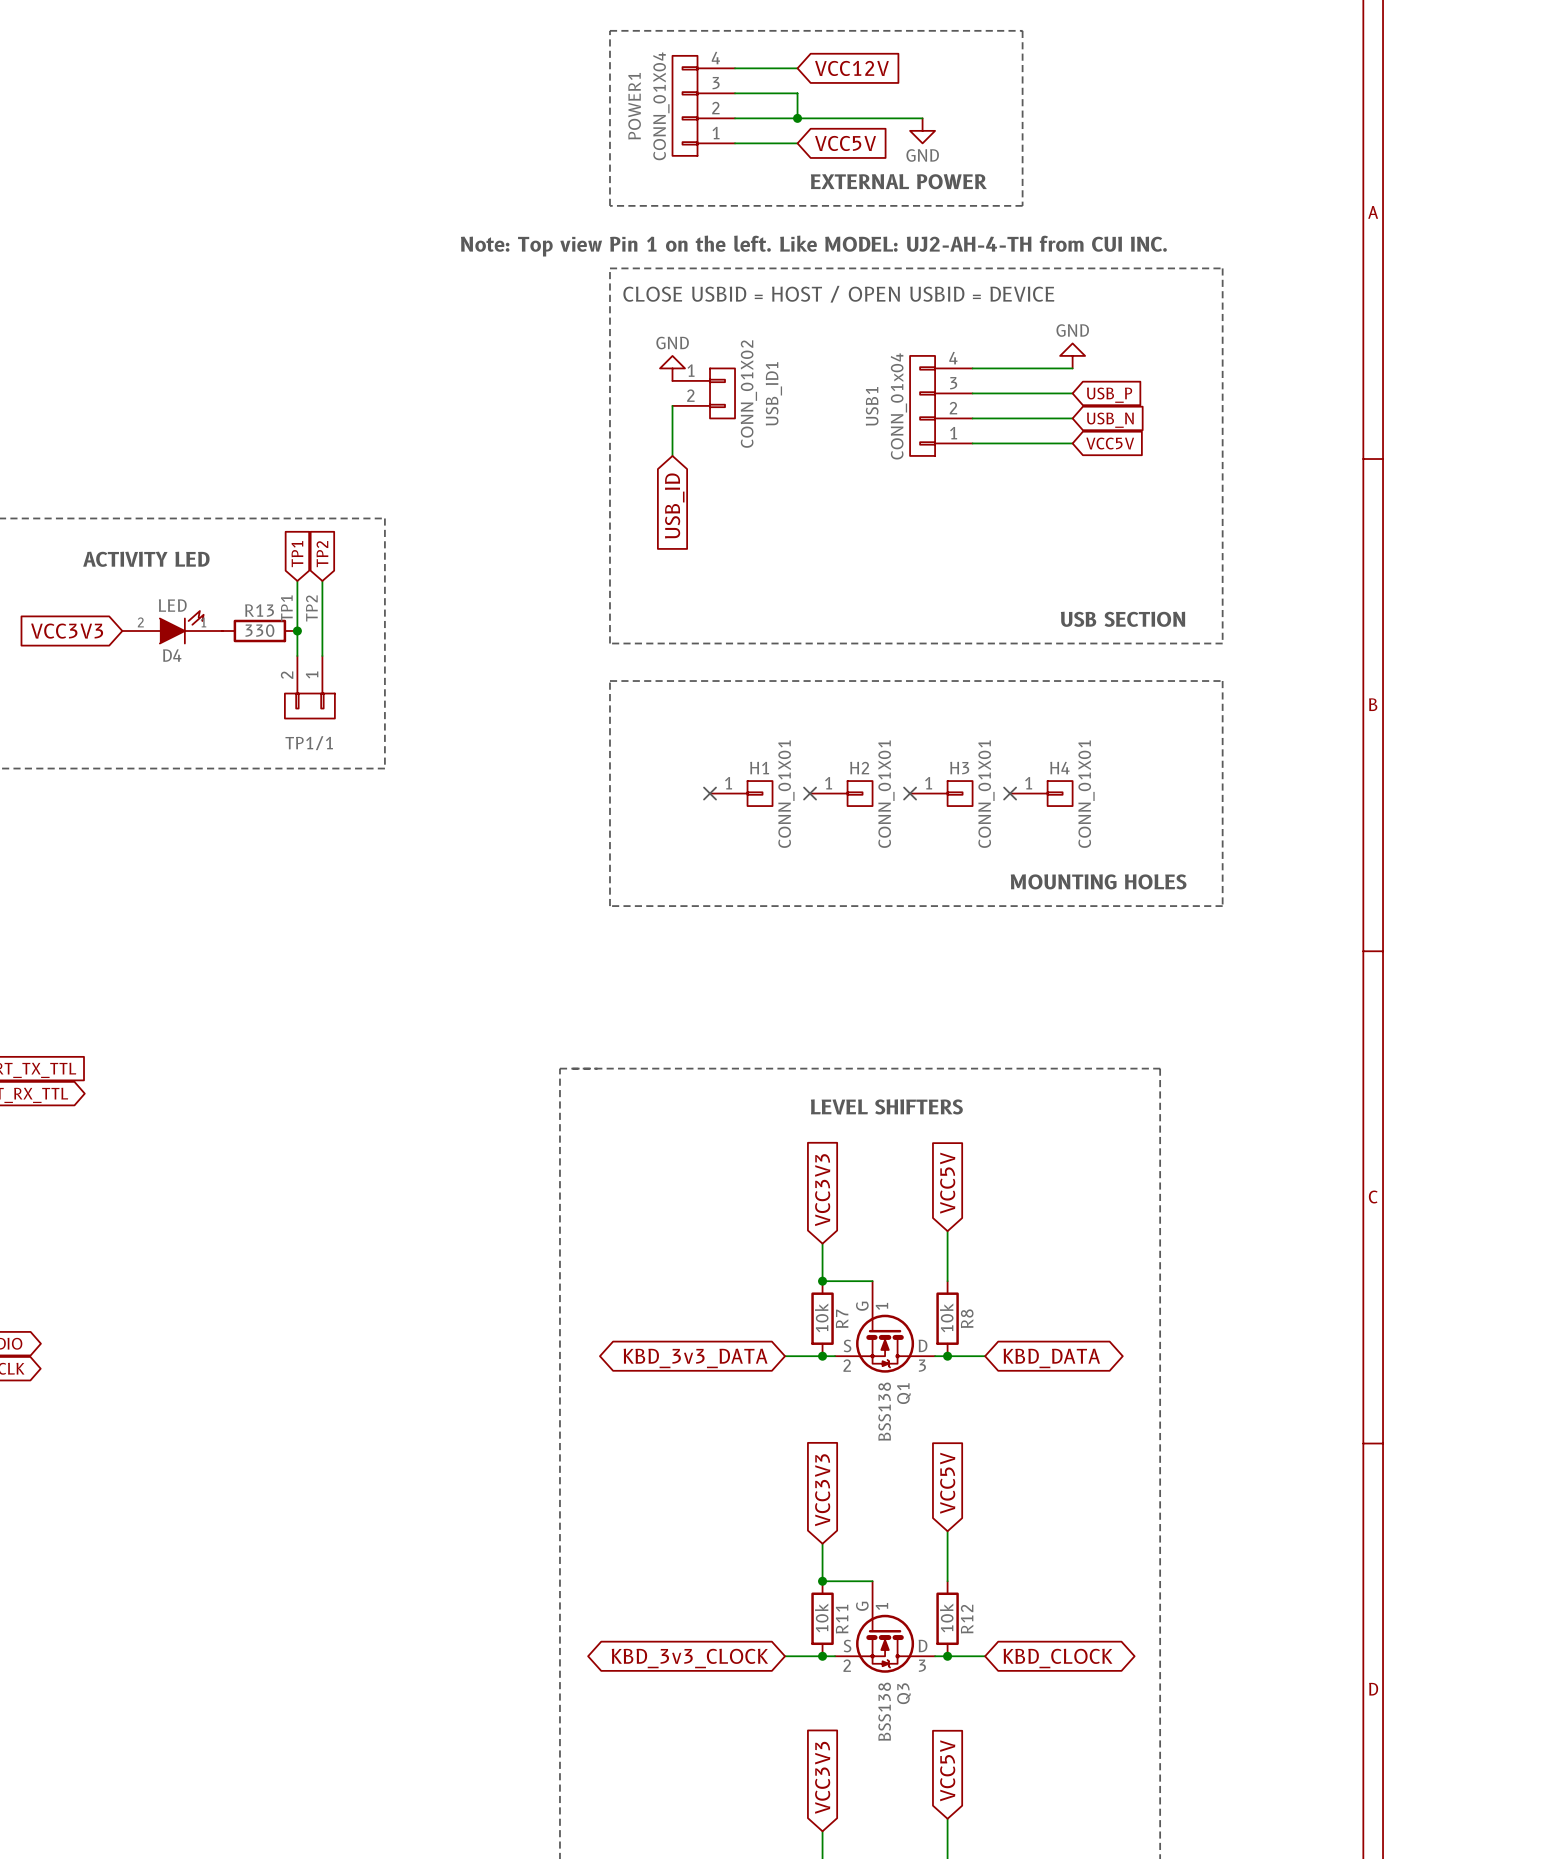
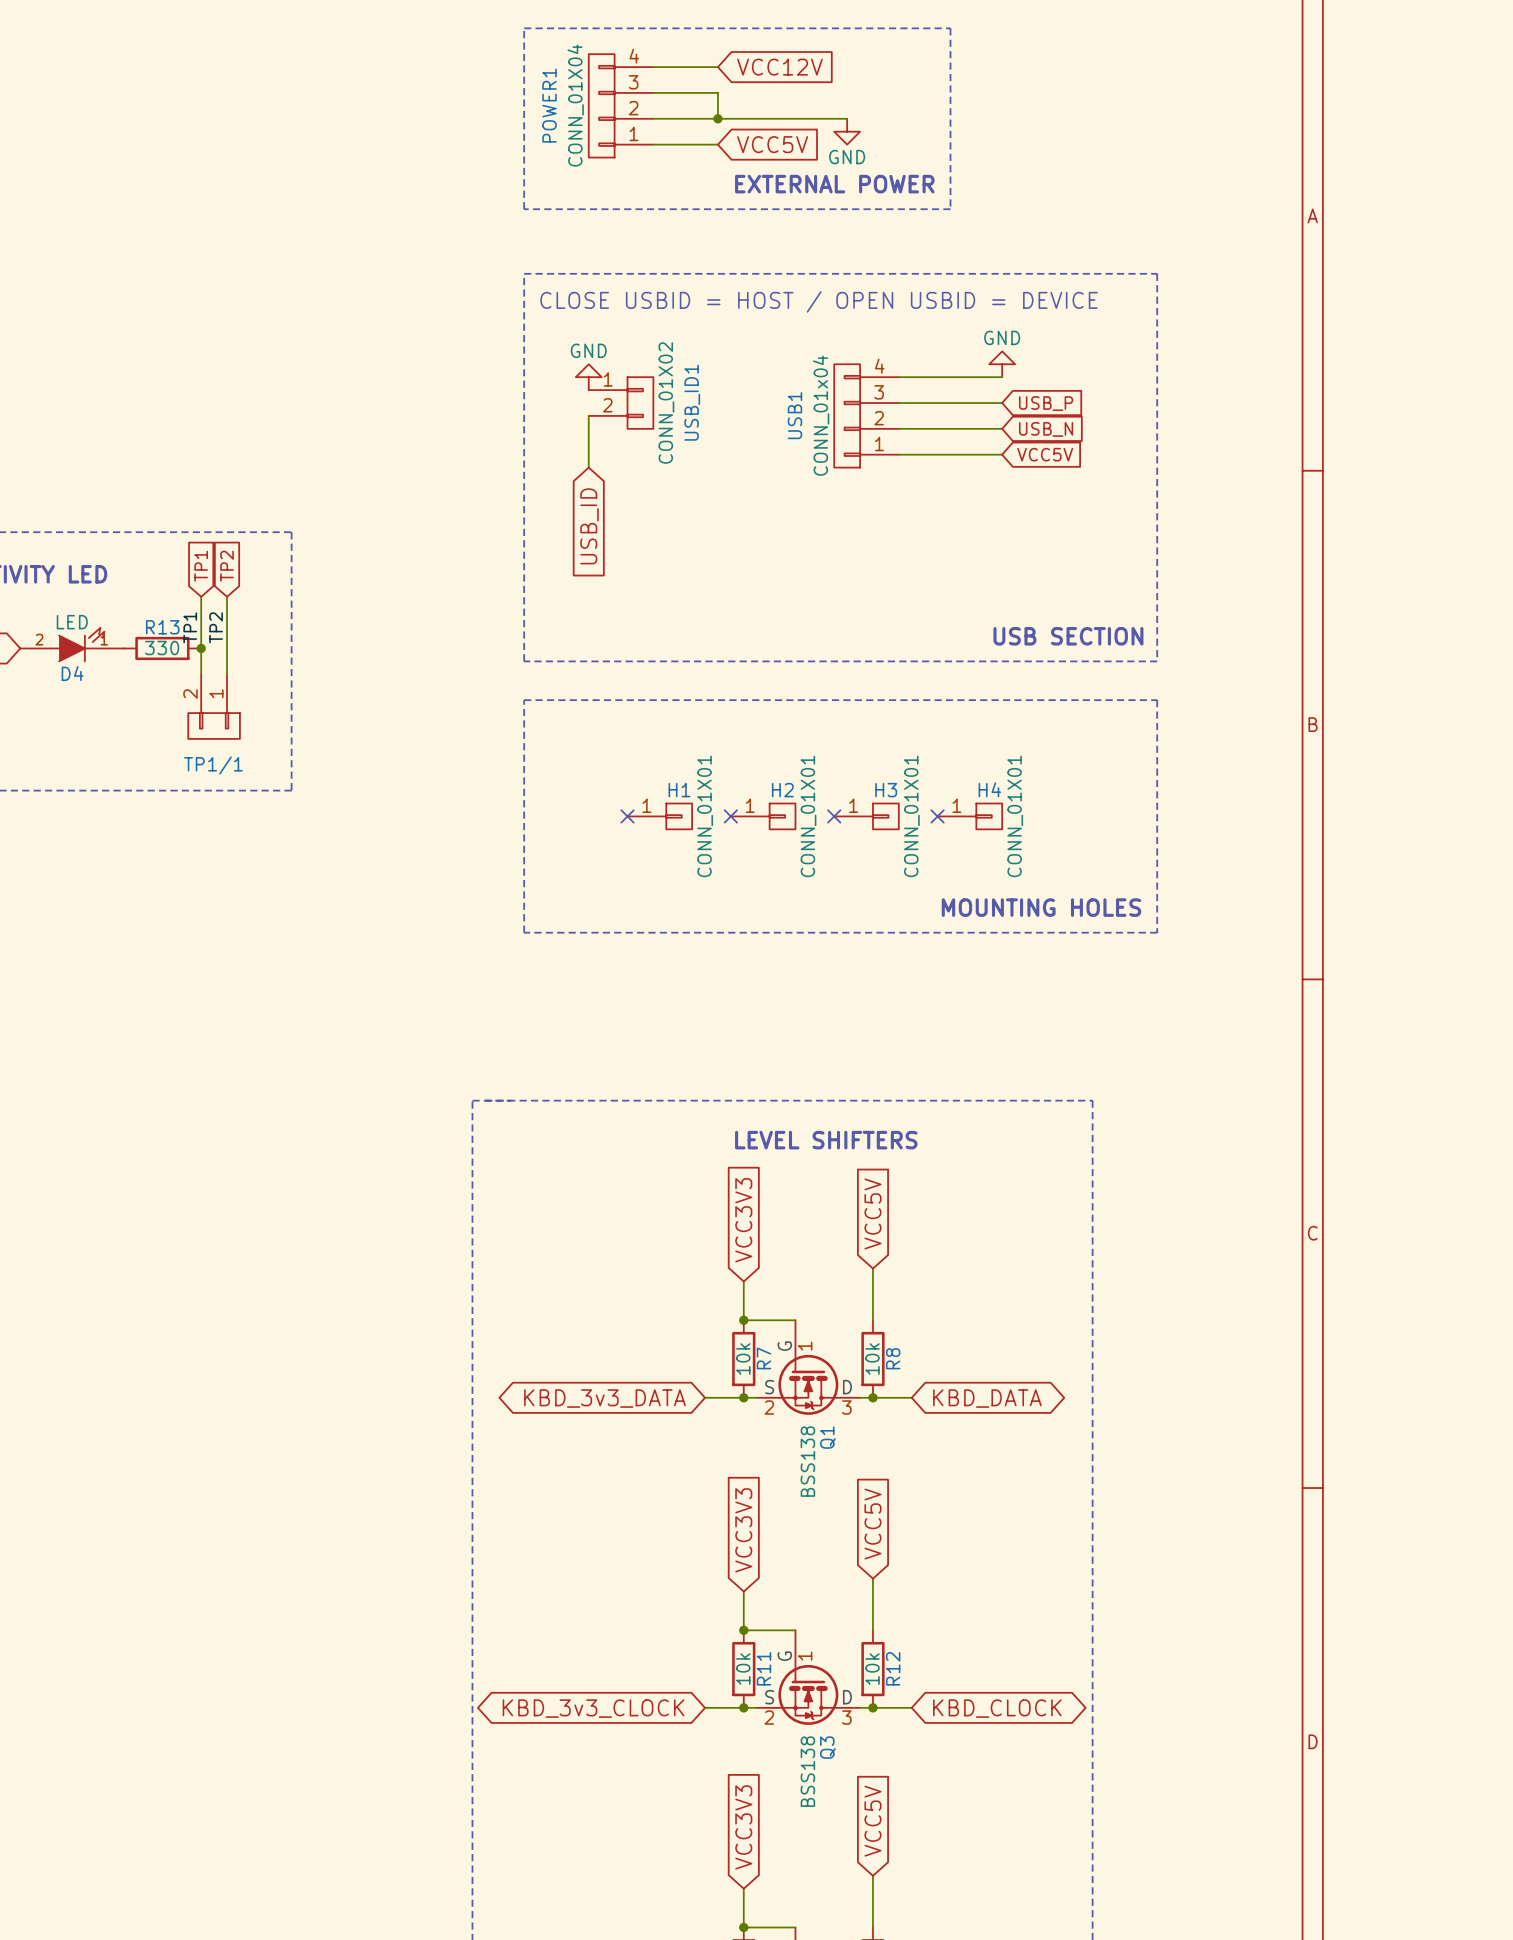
text: Note: Top view Pin 1 on the left. Like MODEL: UJ2-AH-4-TH from CUI INC. (813, 246) -> none

